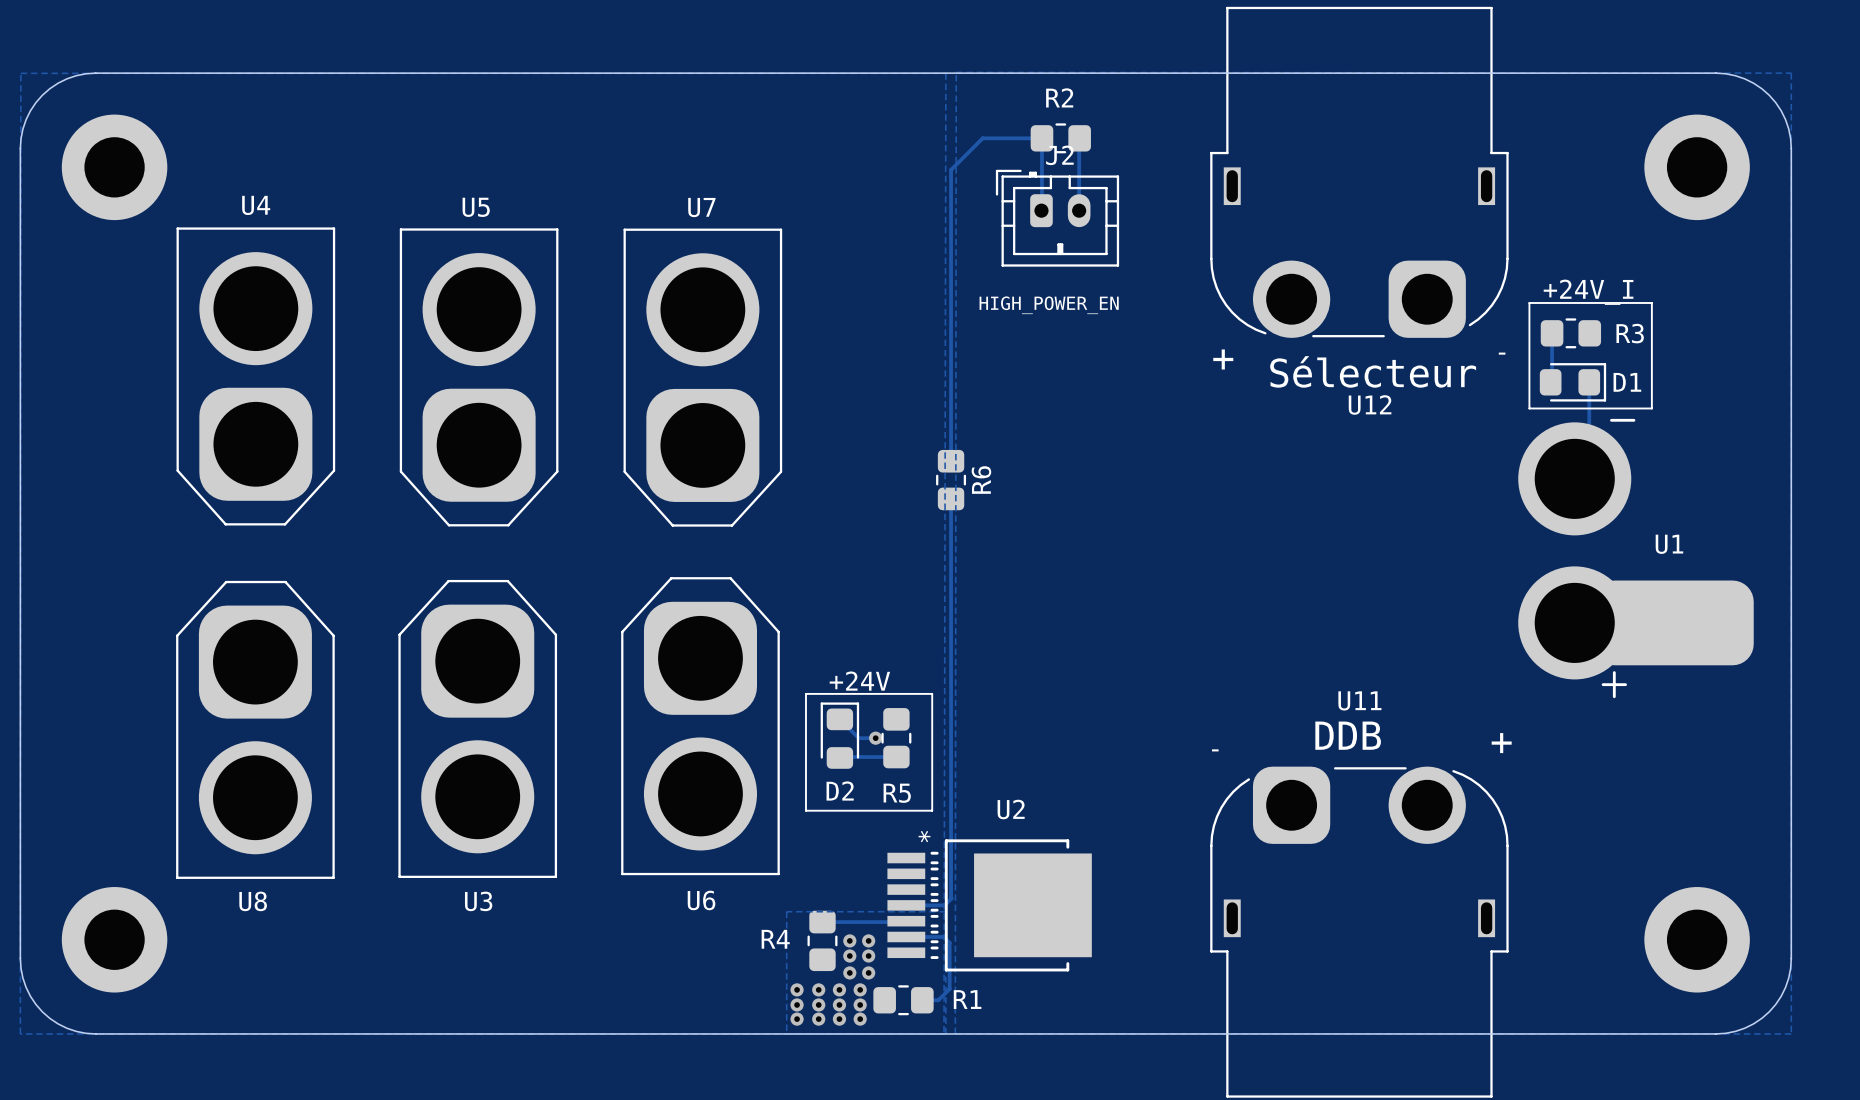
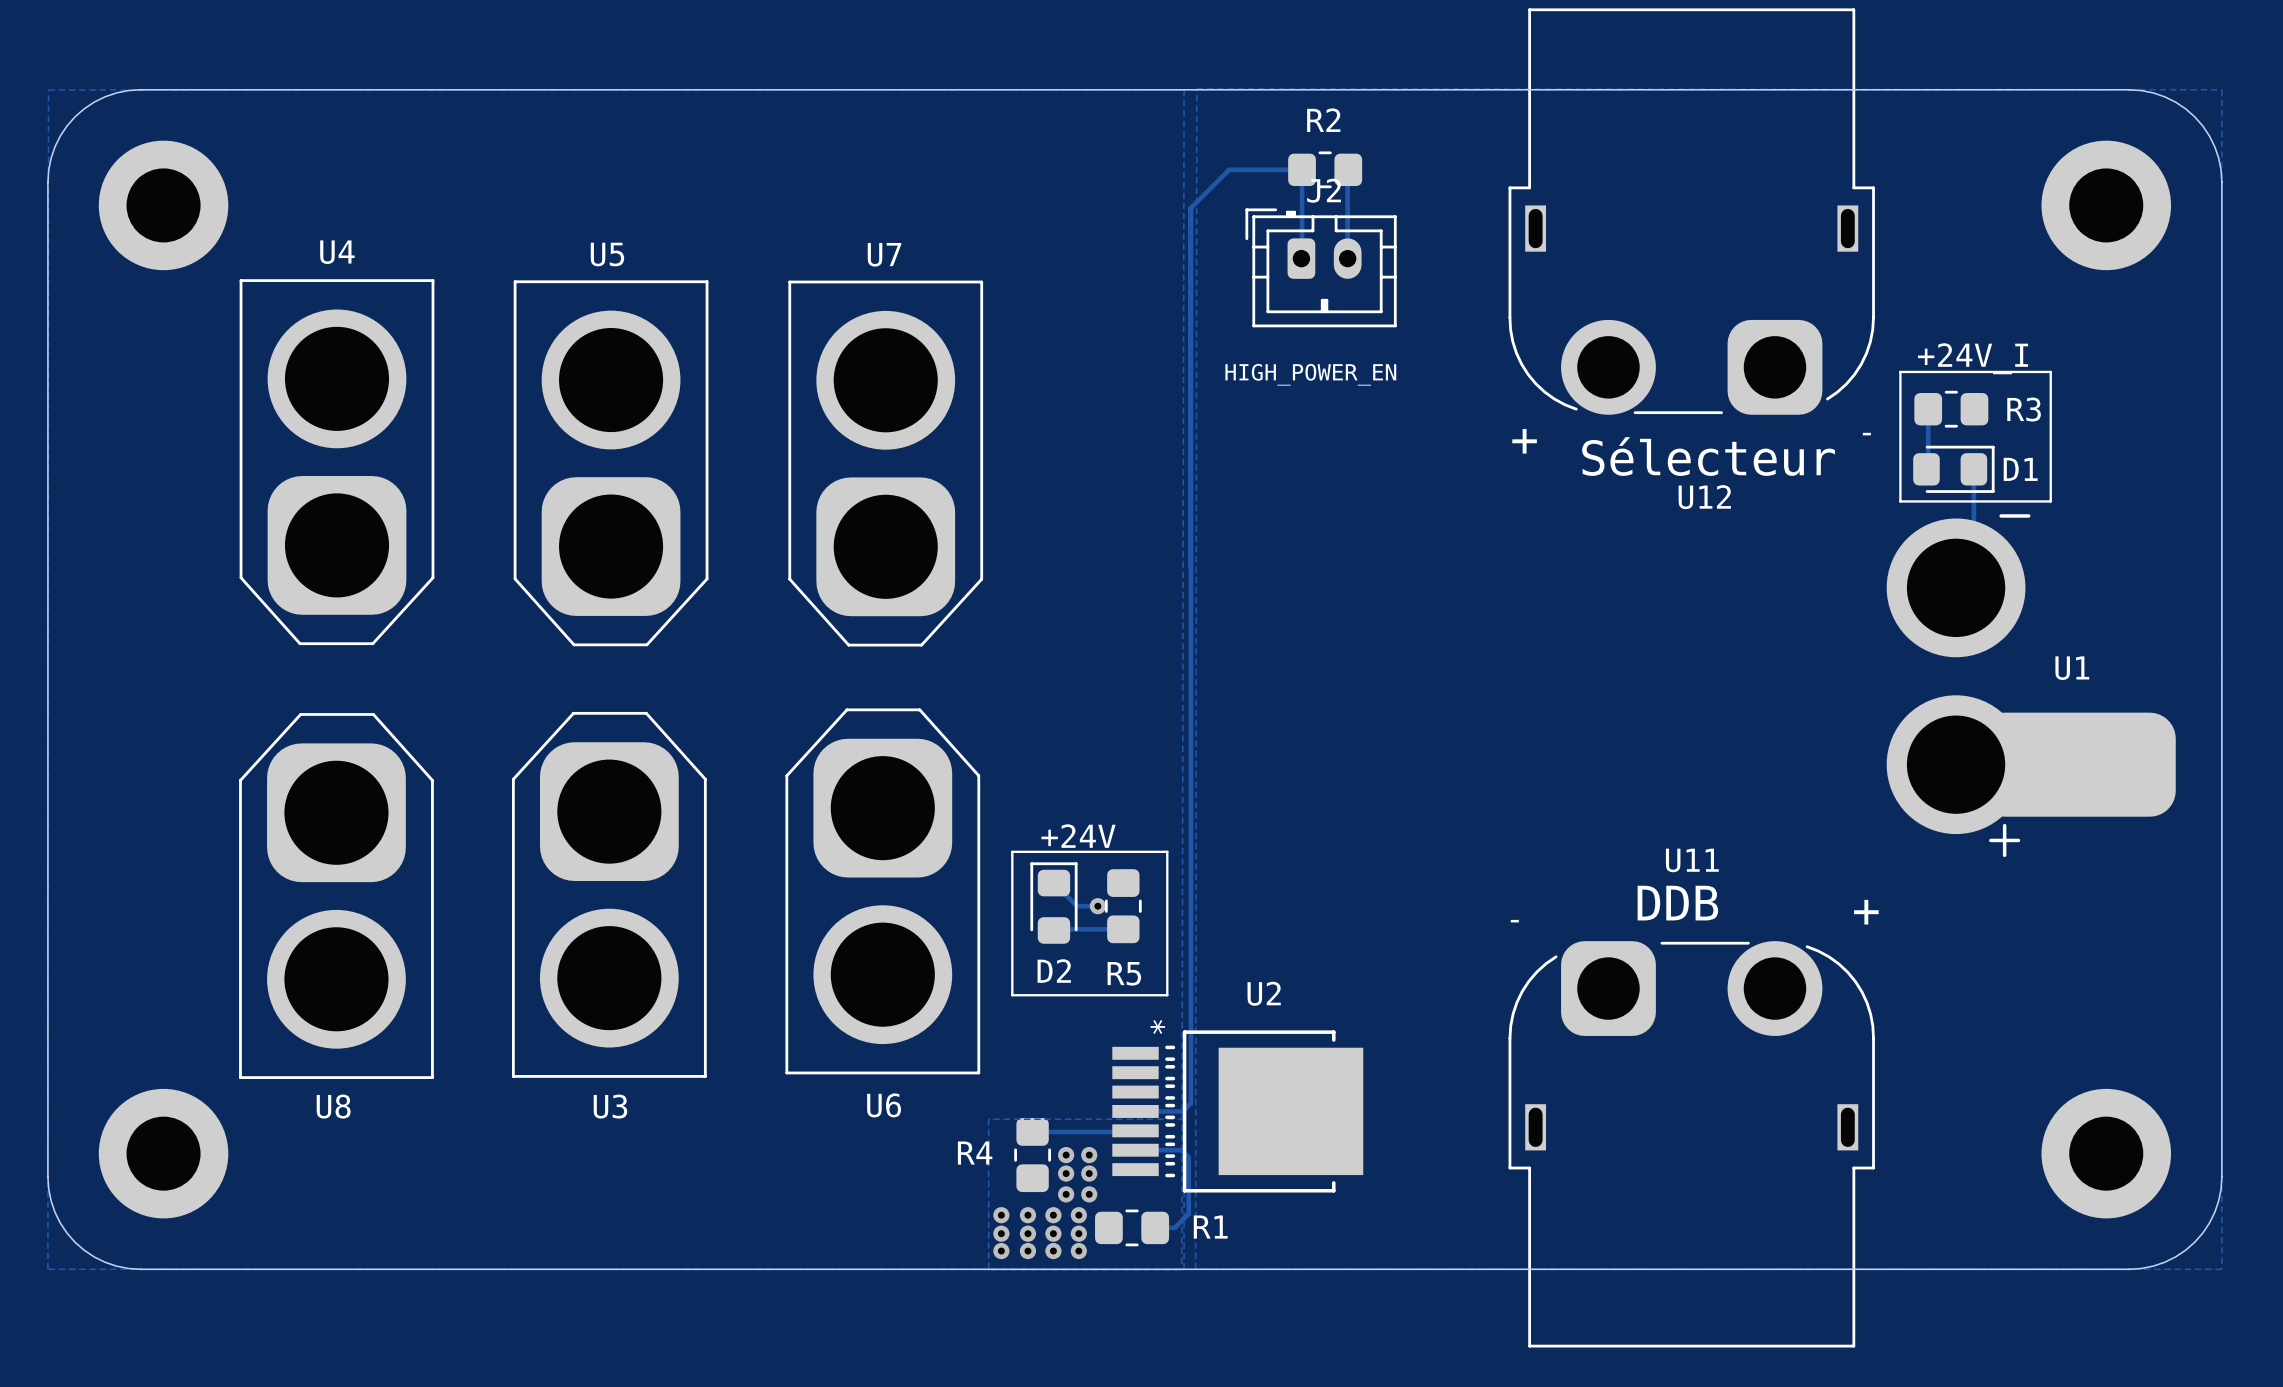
R6: (951, 480) -> none
track: (951, 498) (951, 898) -> (1191, 207) (1191, 1103)

